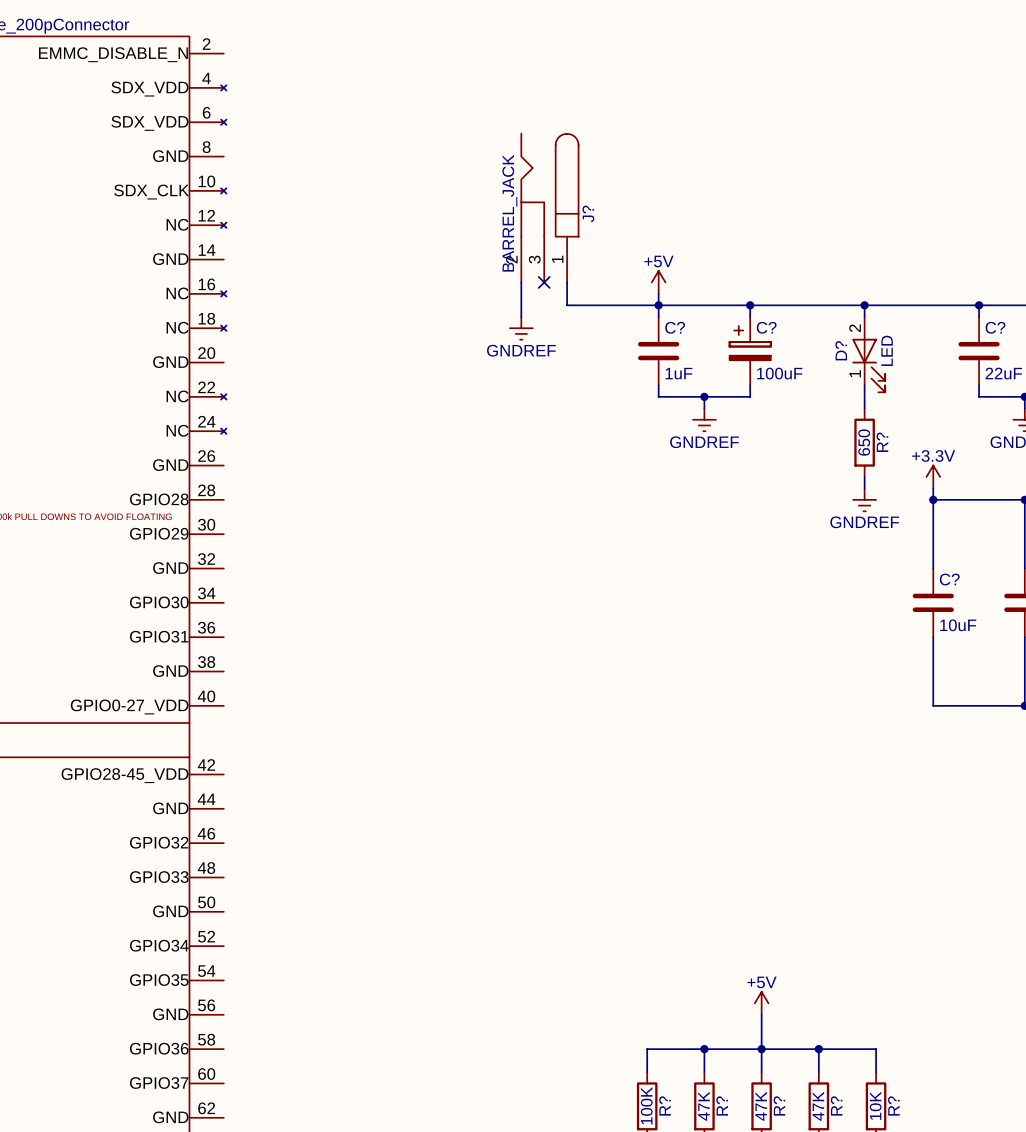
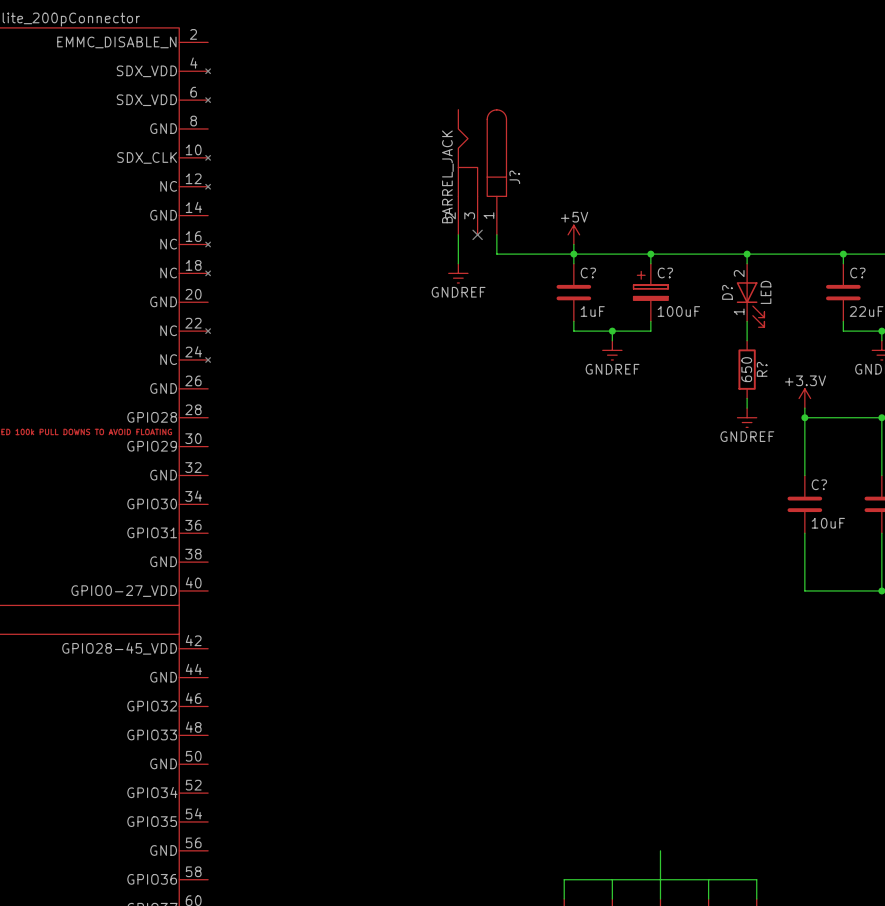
power symbol: +5V (761, 1003) -> none
junction: (704, 1049) -> none
junction: (761, 1049) -> none
junction: (818, 1049) -> none

